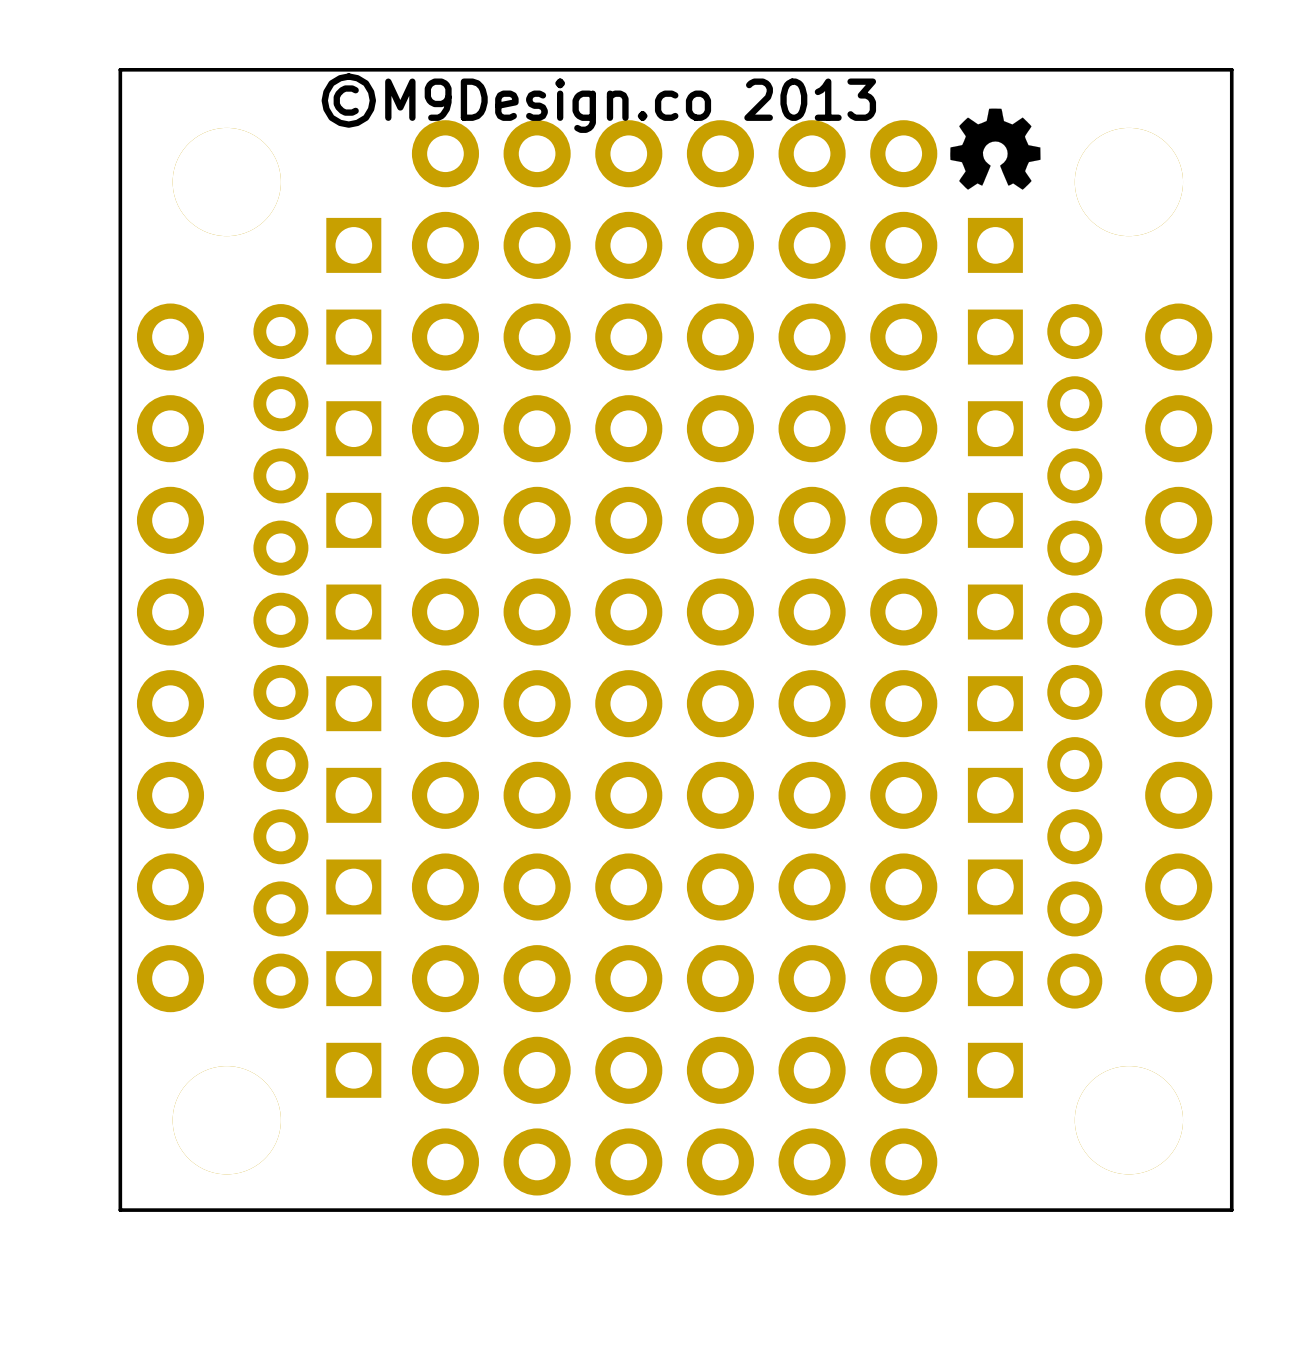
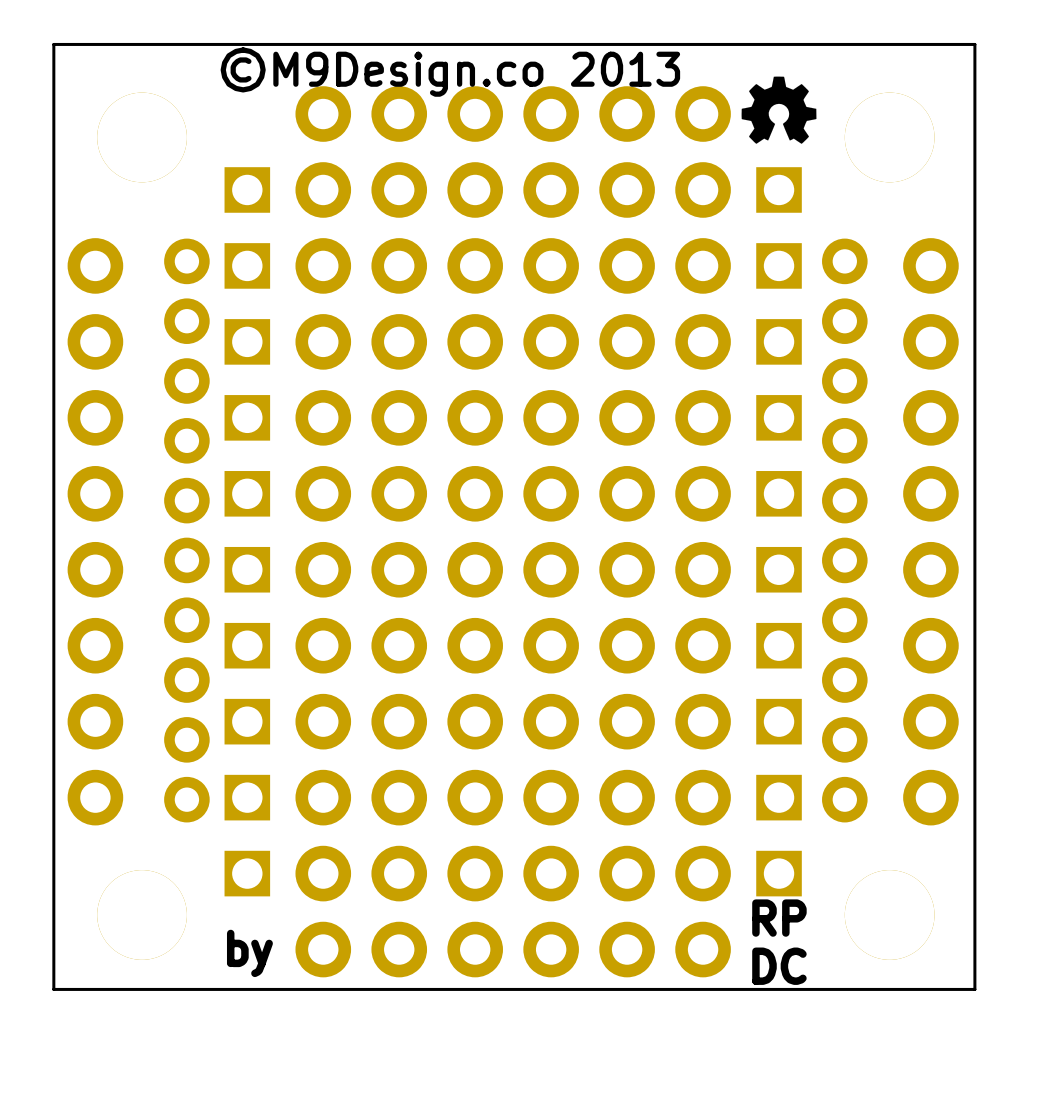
text: none -> RP (779, 918)
text: none -> by (249, 953)
text: none -> DC (779, 966)

